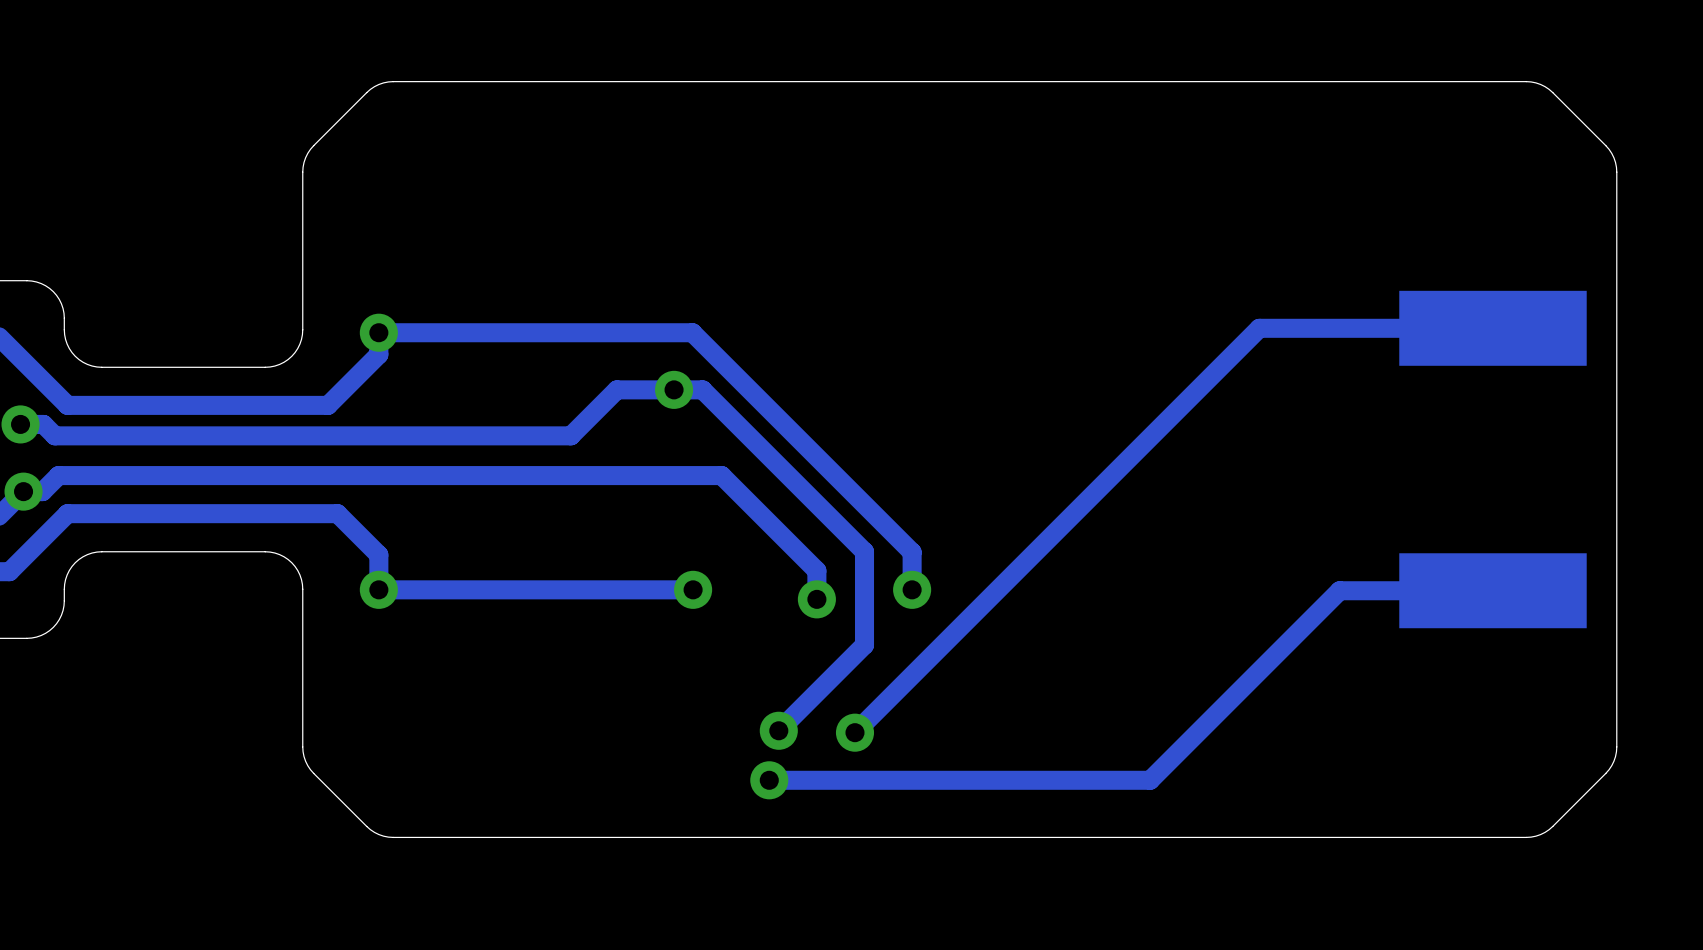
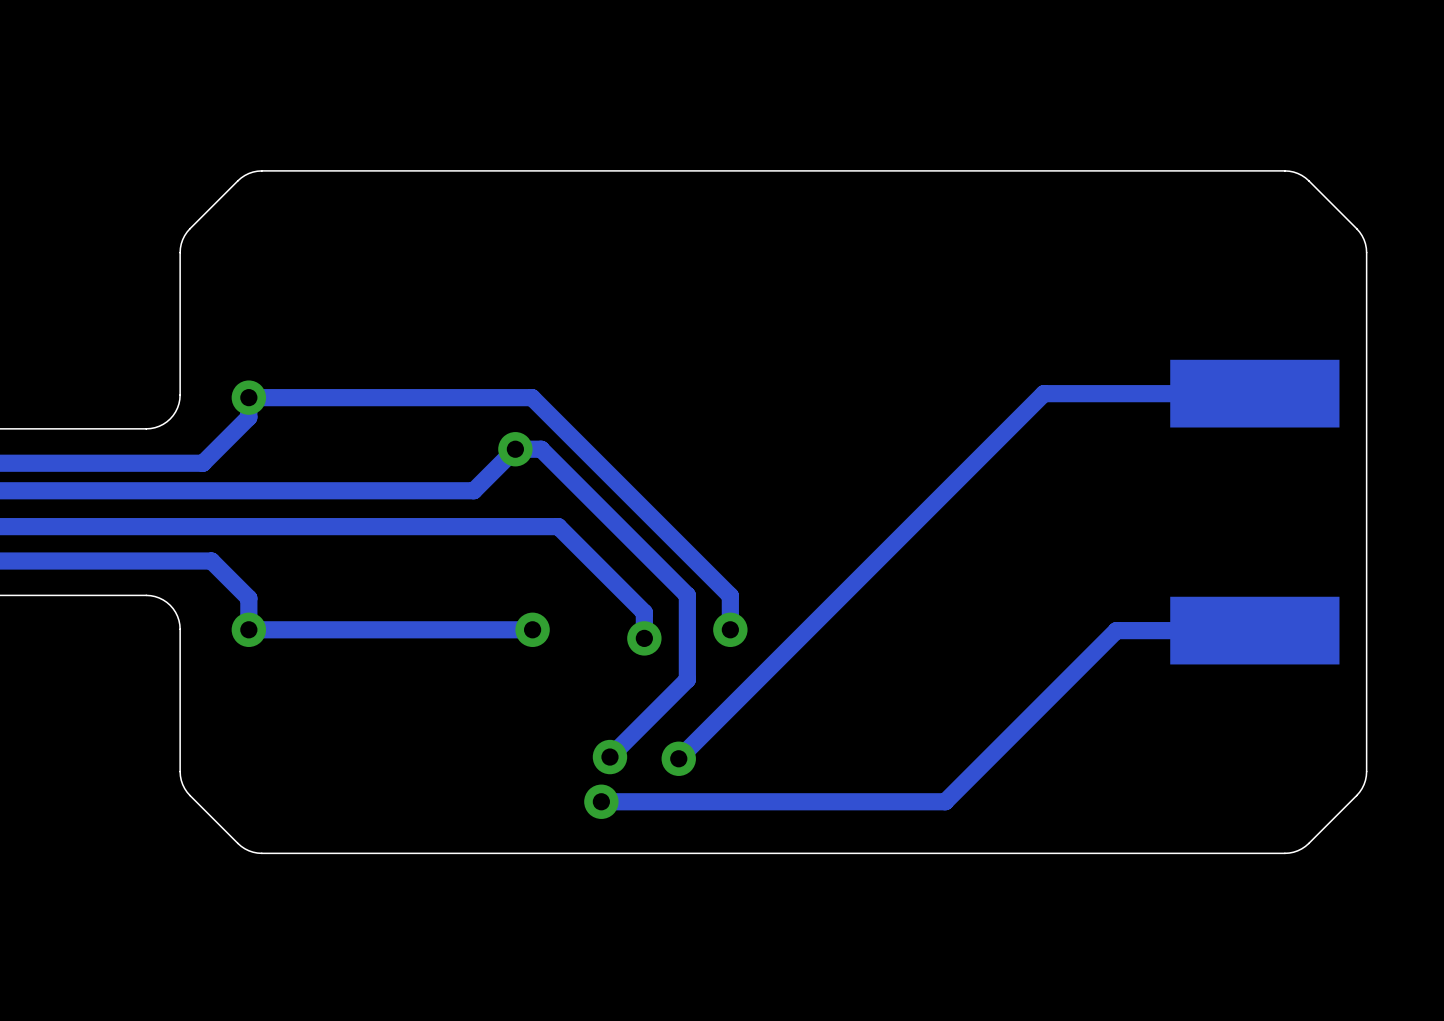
track: (674, 389) (616, 389) (570, 435) -> (515, 449) (473, 490) (422, 490)

